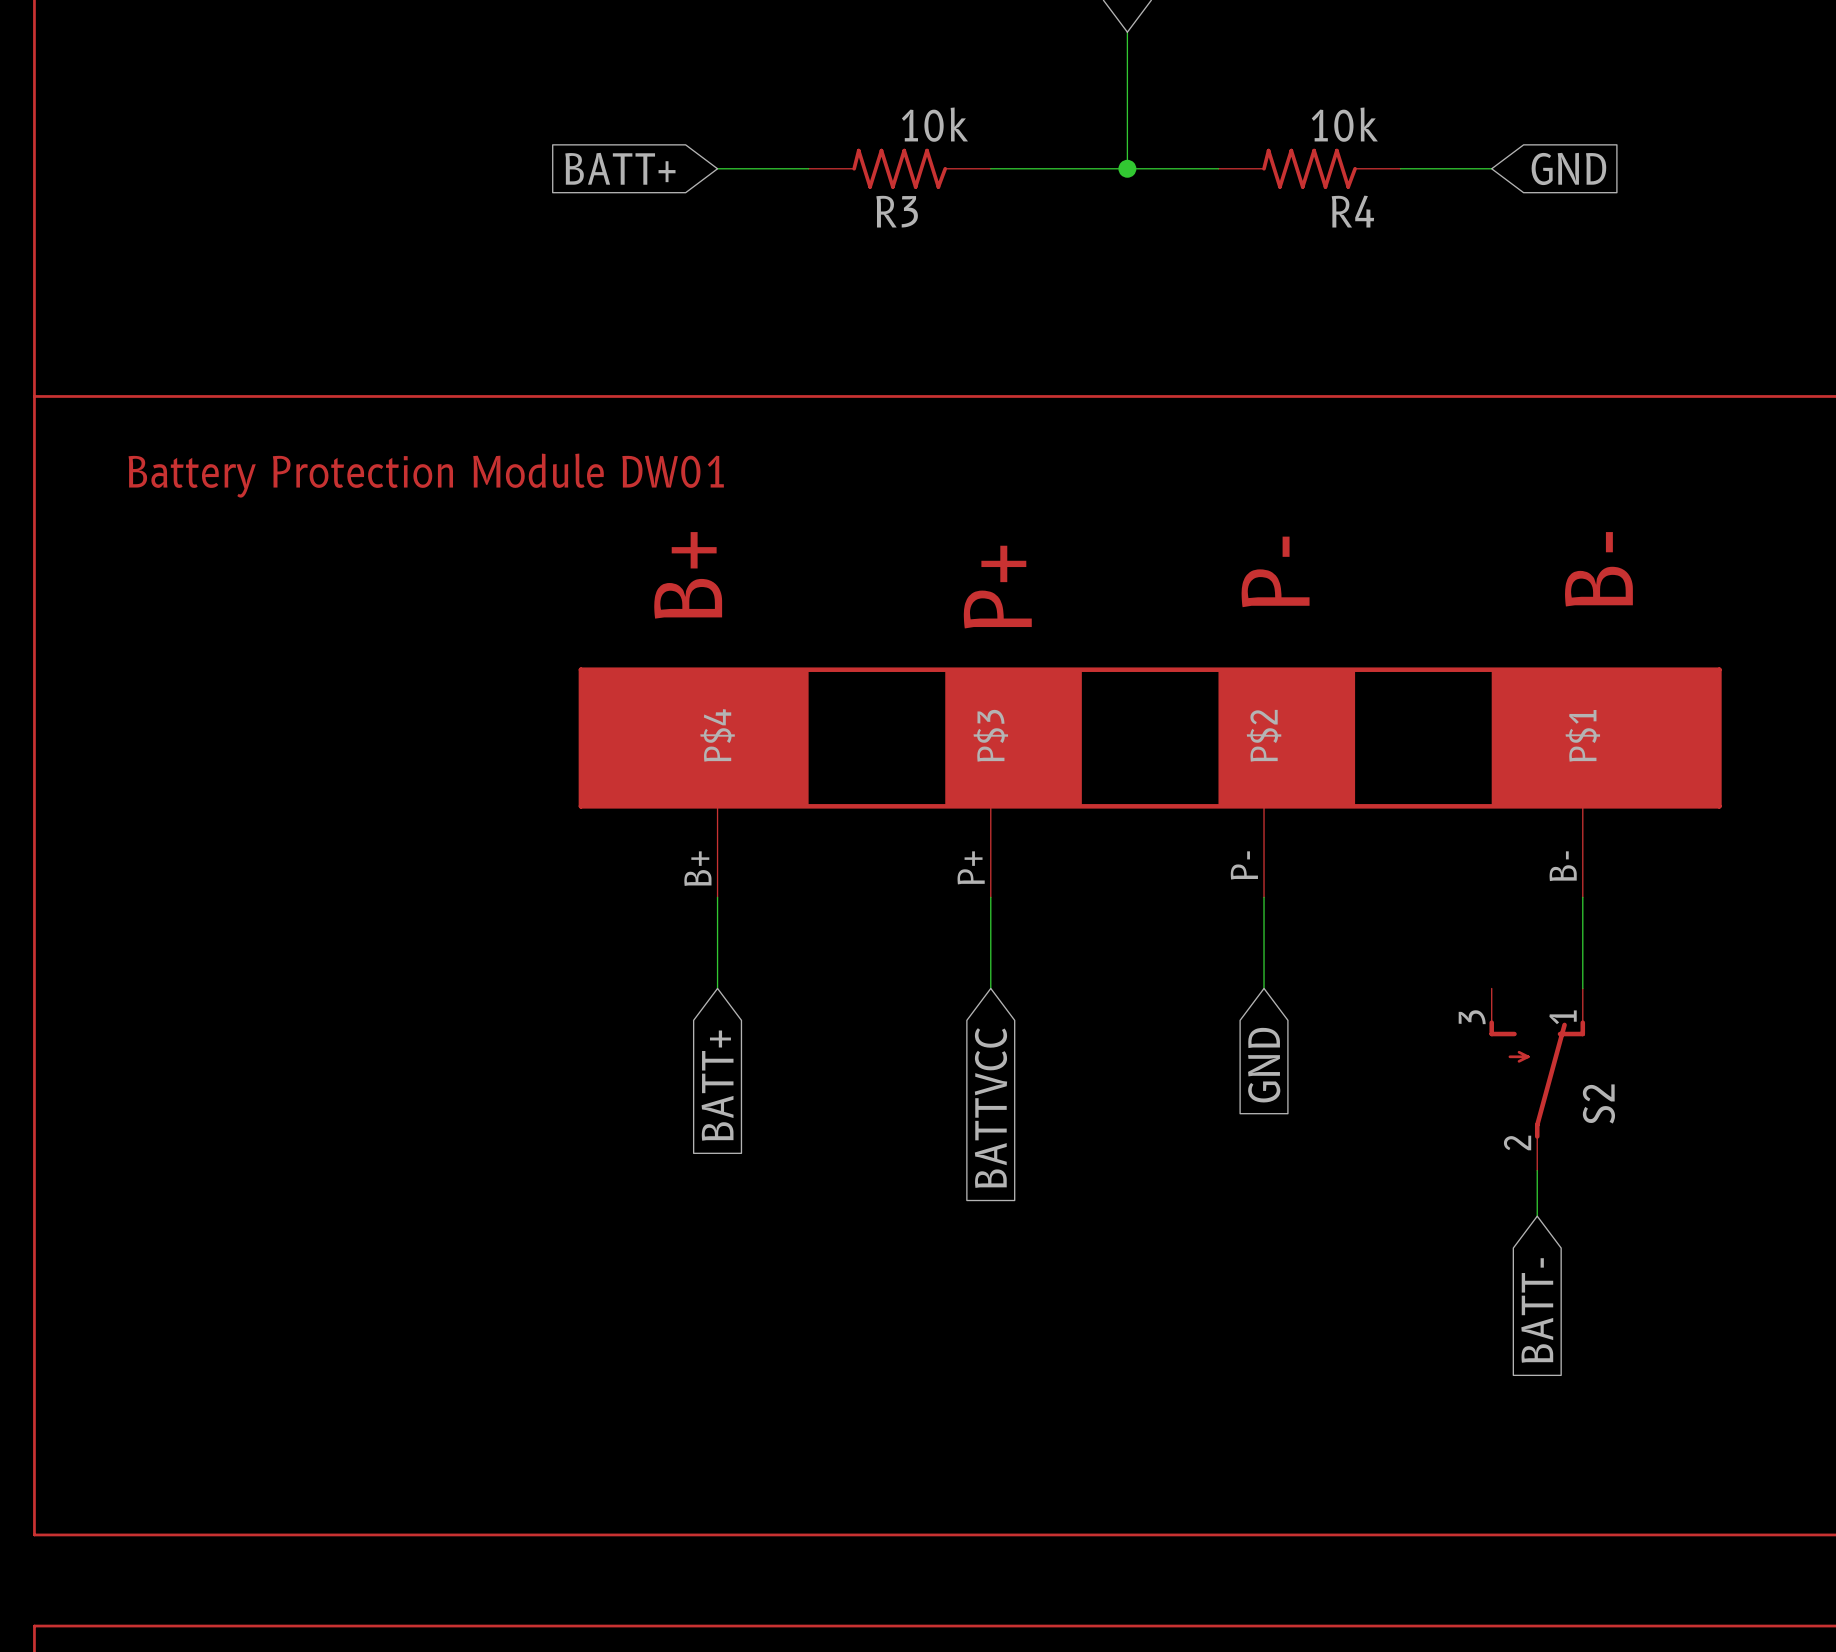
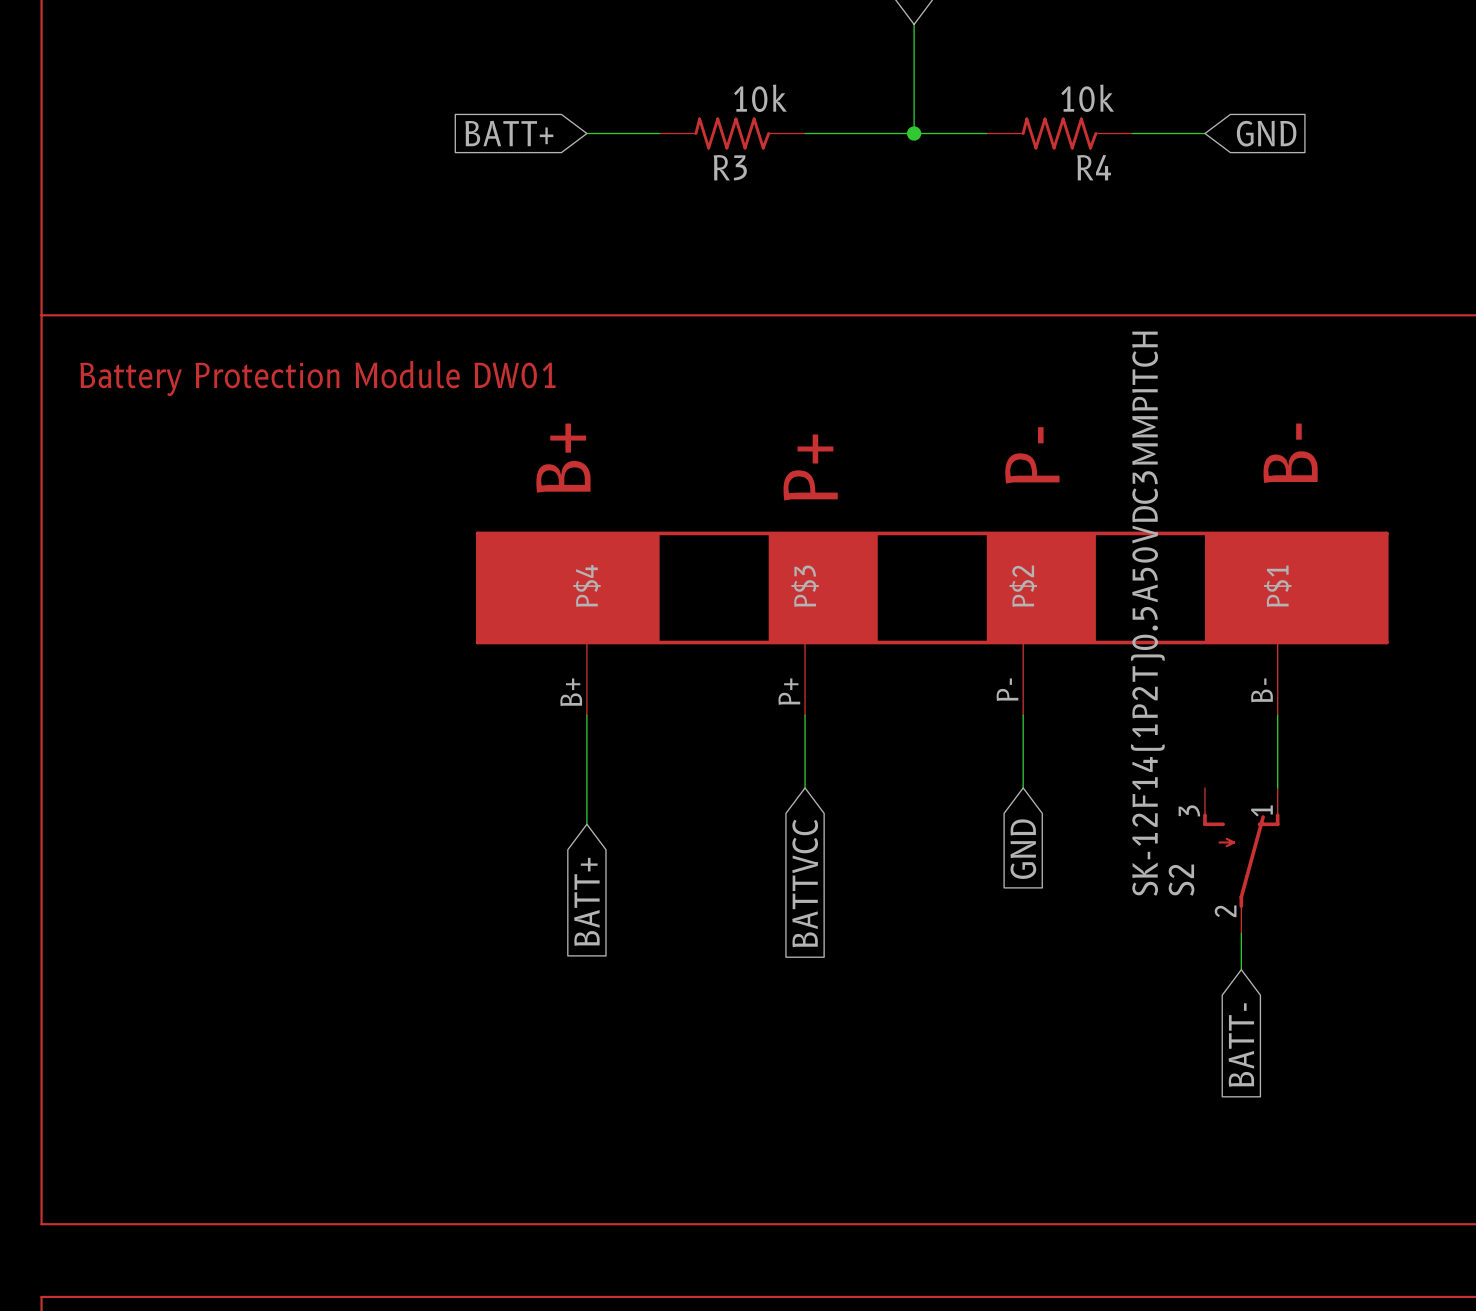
text position: Battery Protection Module DW01 (426, 475) -> Battery Protection Module DW01 (317, 378)
S2 value: none -> SK-12F14(1P2T)0.5A50VDC3MMPITCH (1147, 613)
wire: none -> (586, 787) (586, 824)
global label position: BATT+ (717, 1085) -> BATT+ (586, 901)
S2 name position: S2 (1598, 1103) -> S2 (1181, 880)

